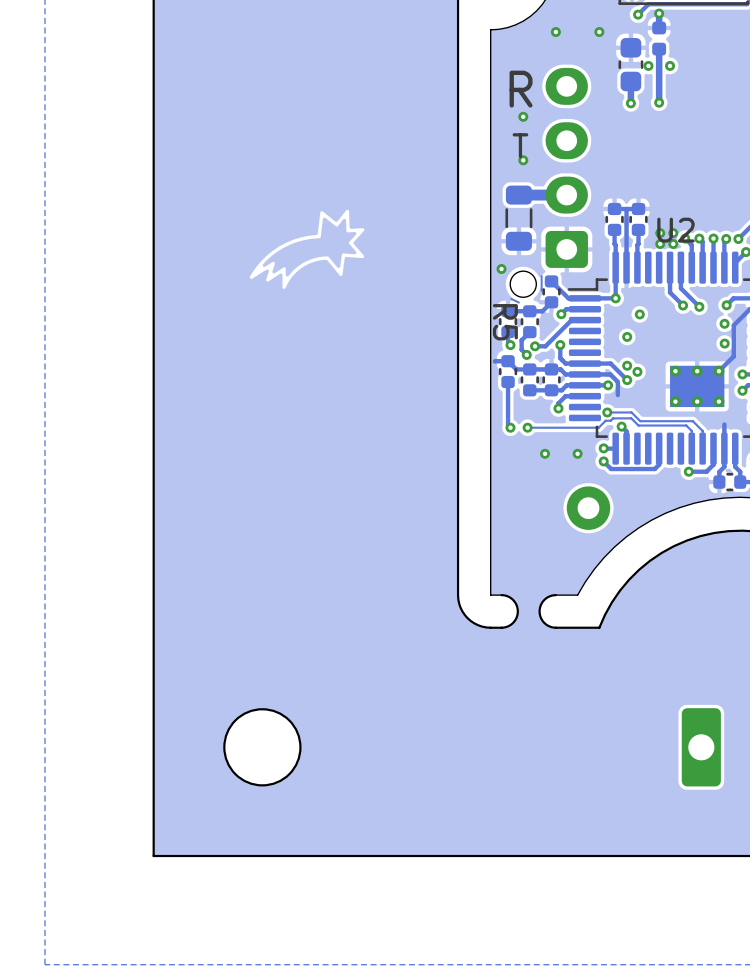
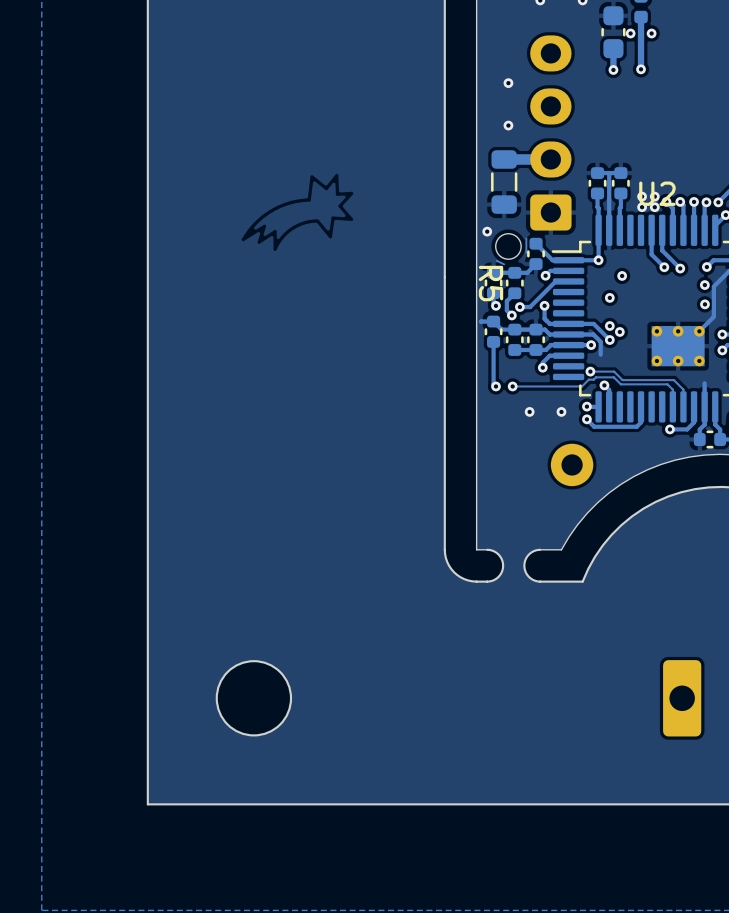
text: R (521, 89) -> none
text: T (520, 145) -> none

